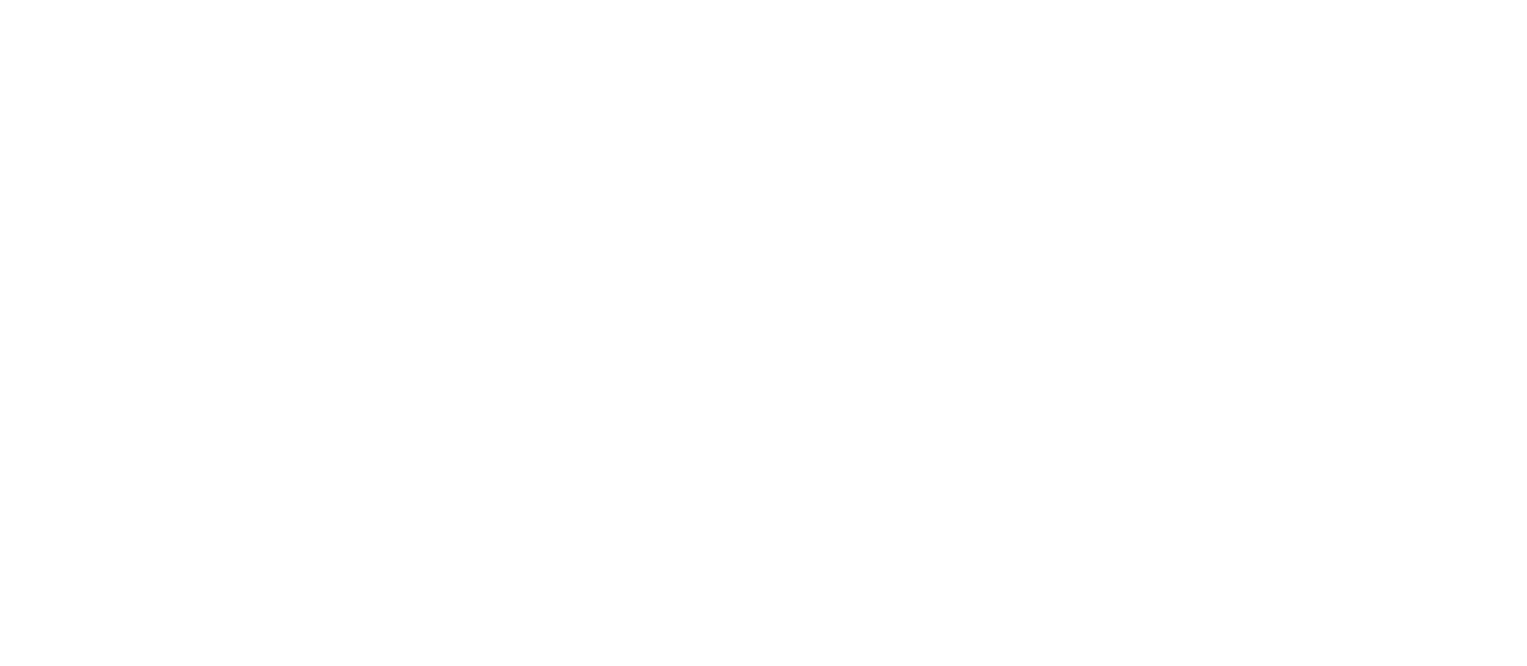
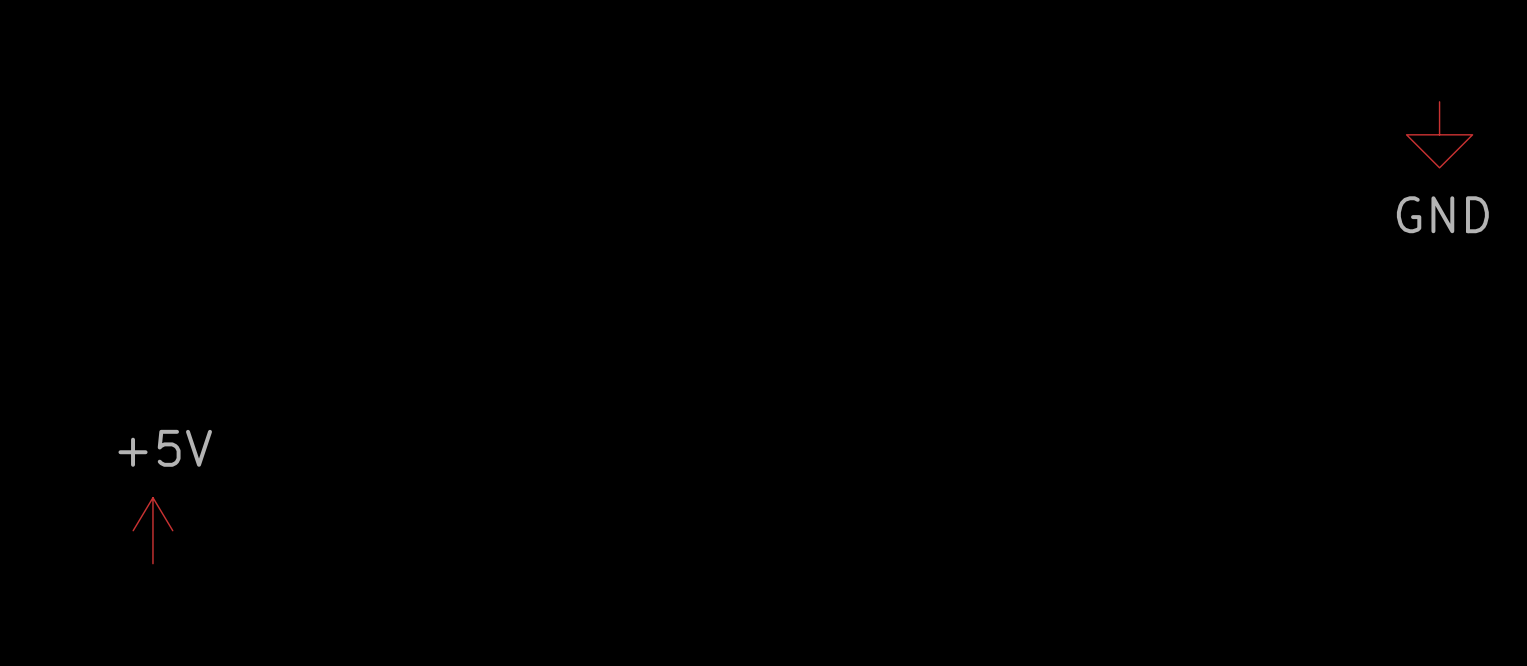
power symbol: none -> GND (1439, 134)
power symbol: none -> +5V (152, 530)

